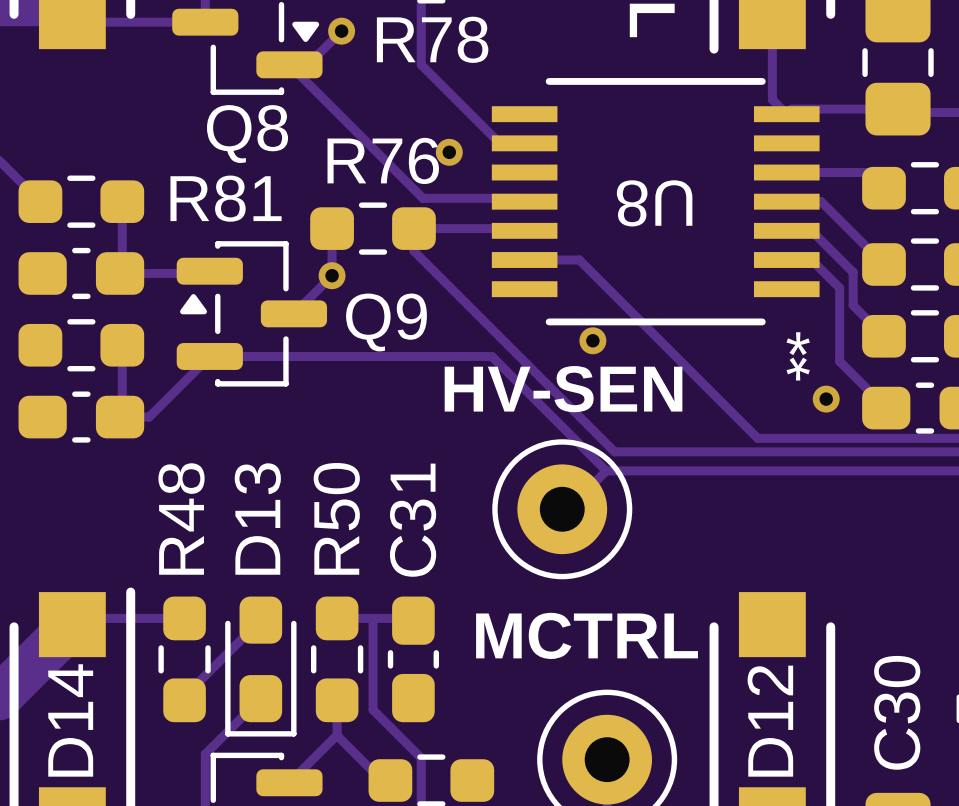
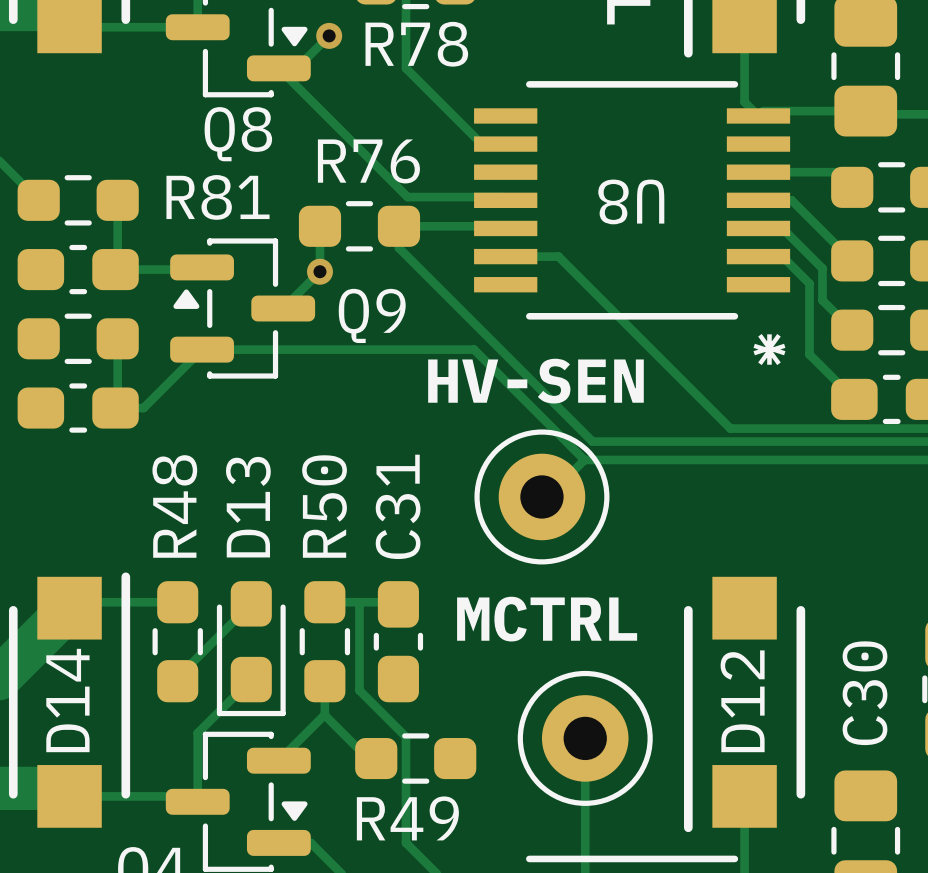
via: (449, 152) -> none
via: (592, 340) -> none
via: (826, 399) -> none

